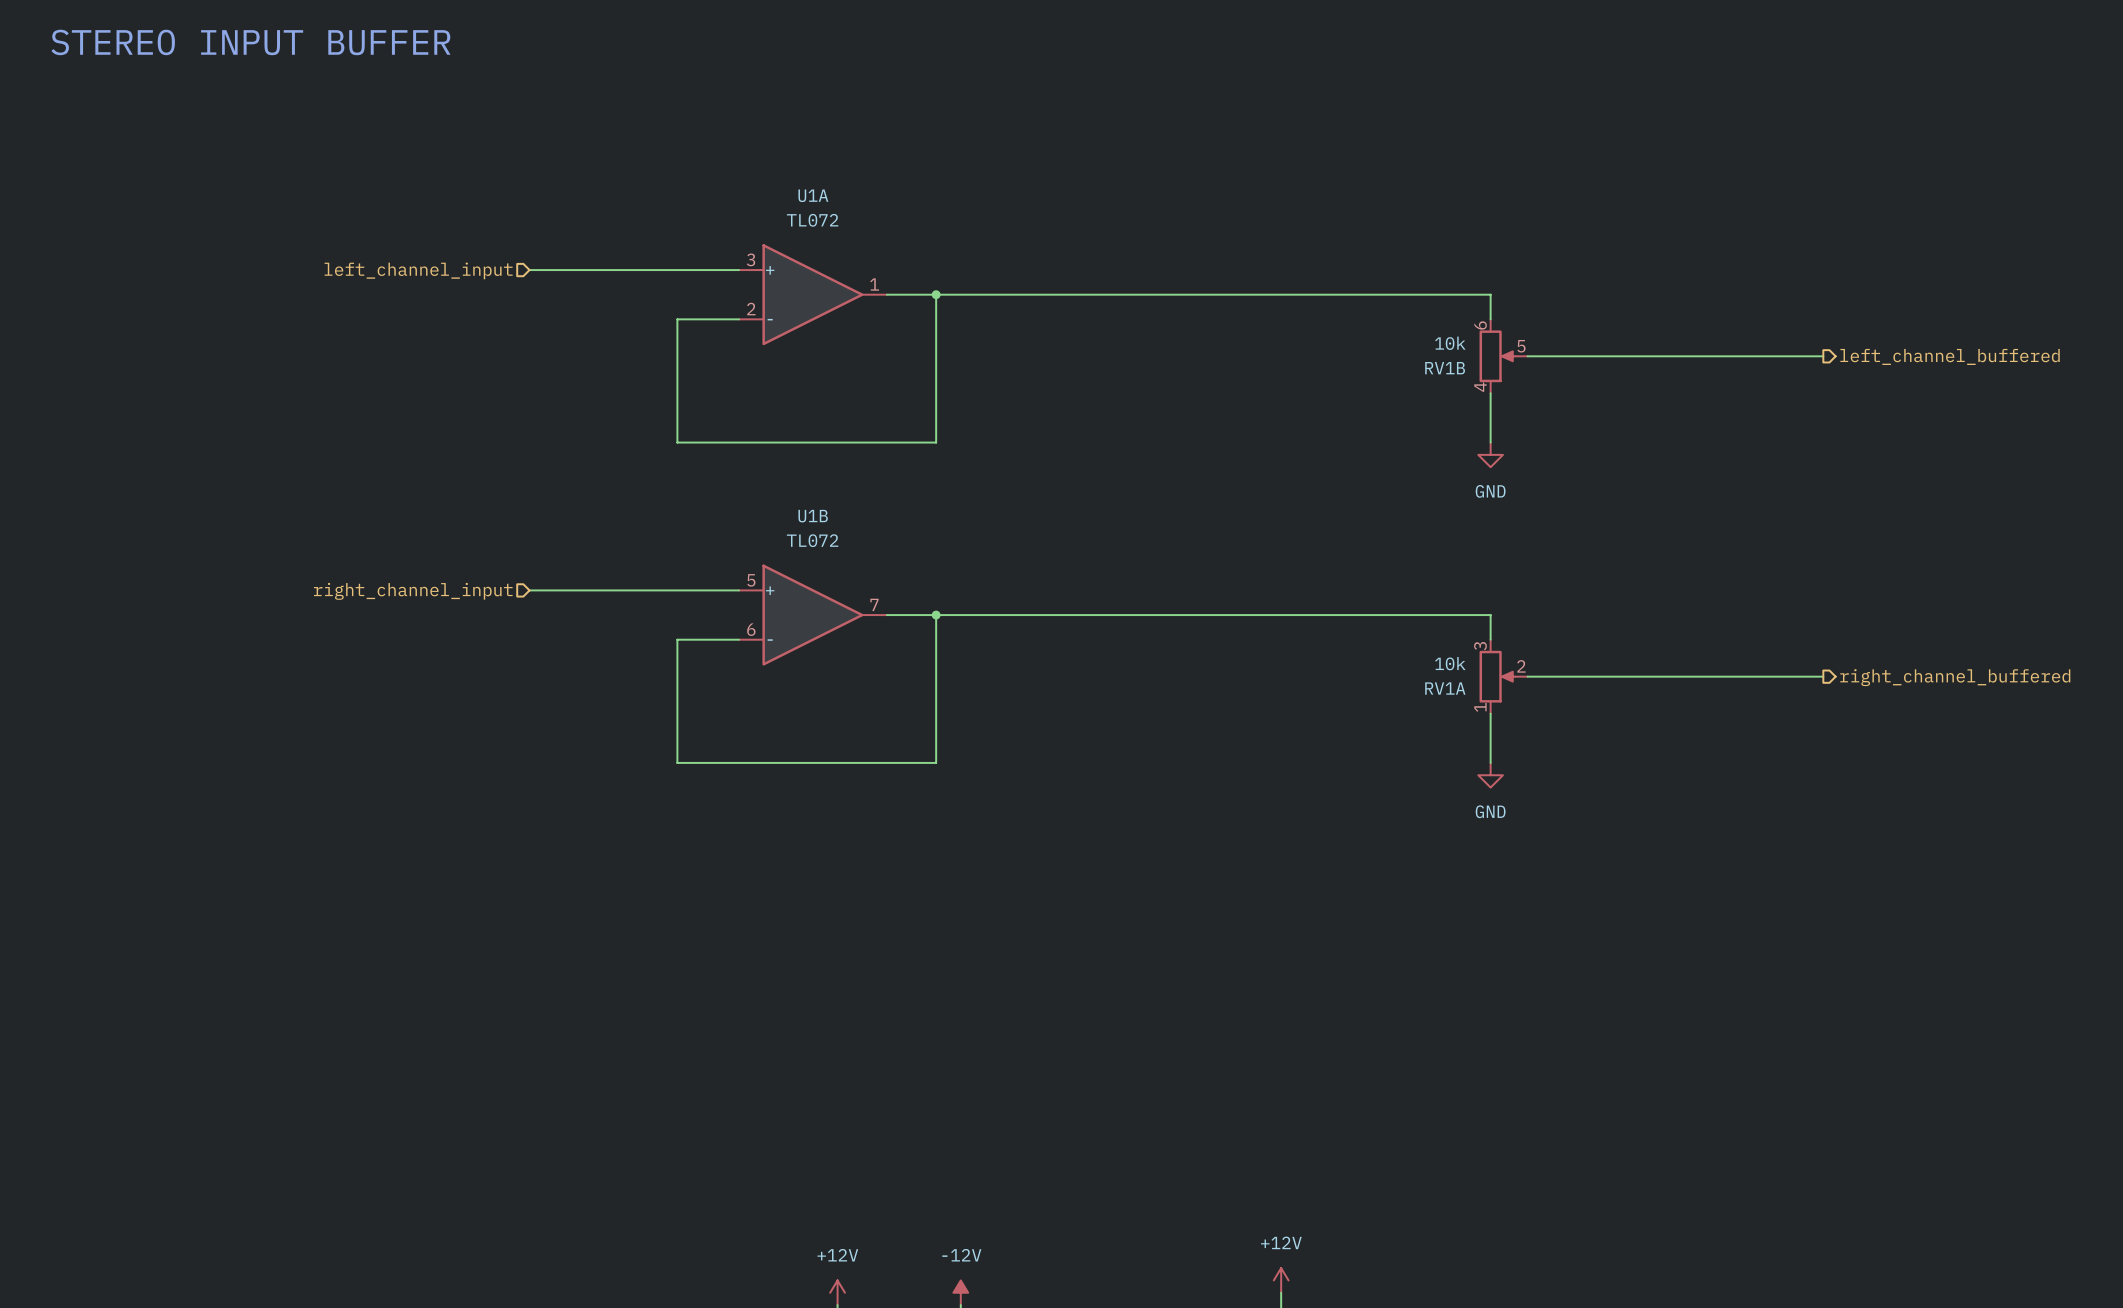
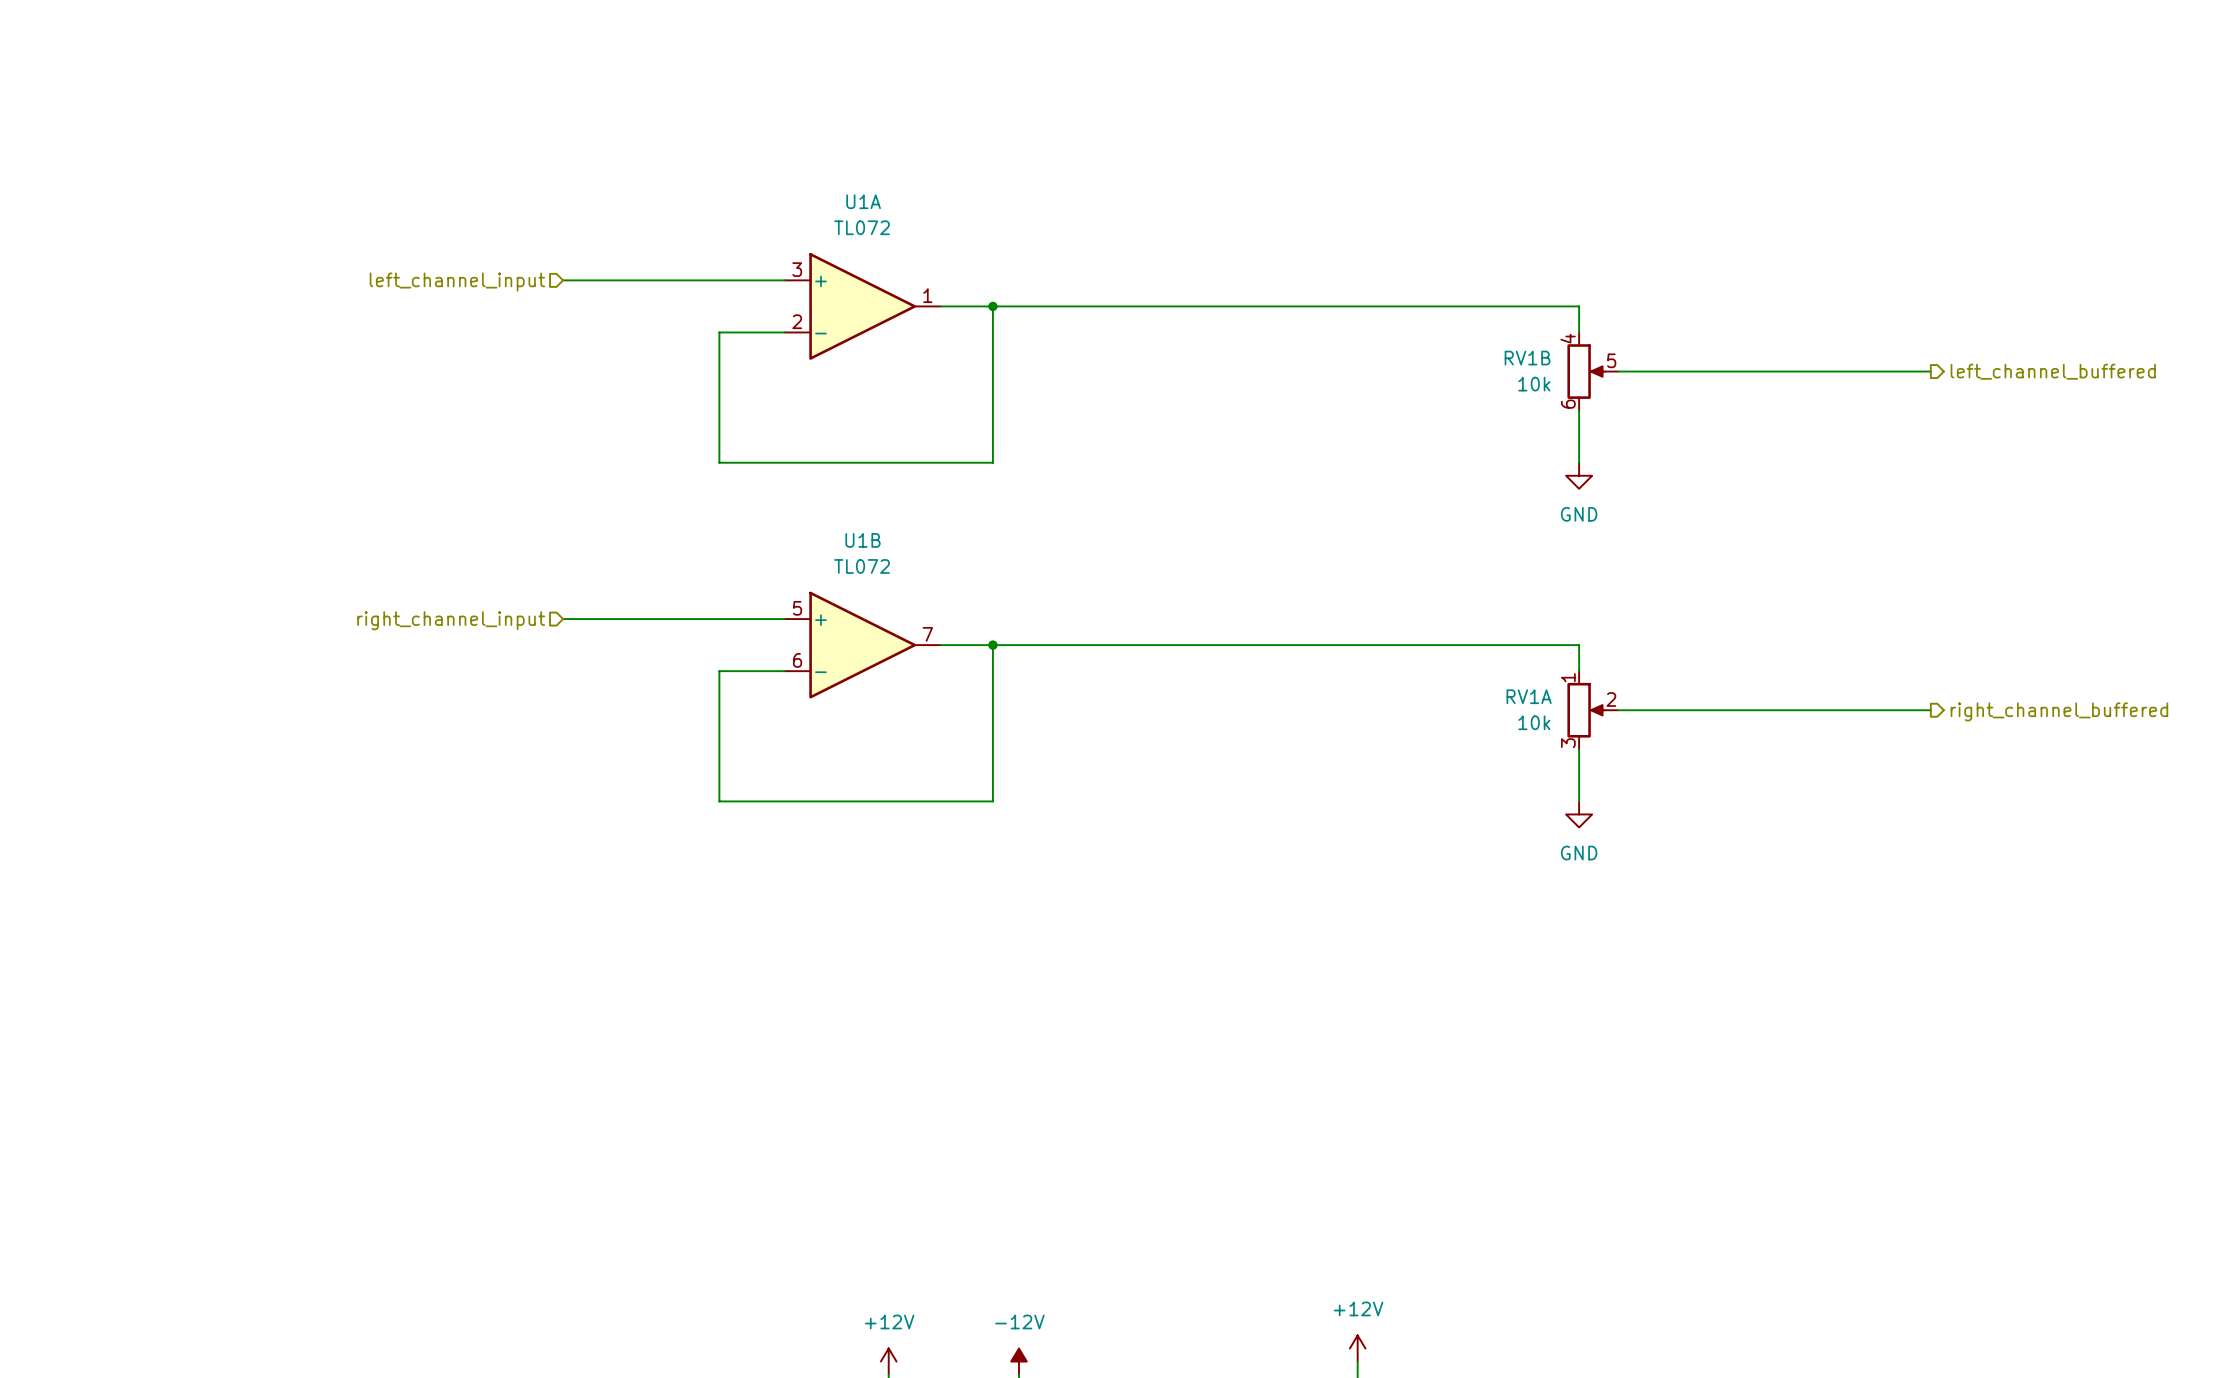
text: STEREO INPUT BUFFER (250, 42) -> none
RV1B flip: as is (1497, 356) -> up-down (1586, 371)
RV1A flip: as is (1497, 676) -> up-down (1586, 710)

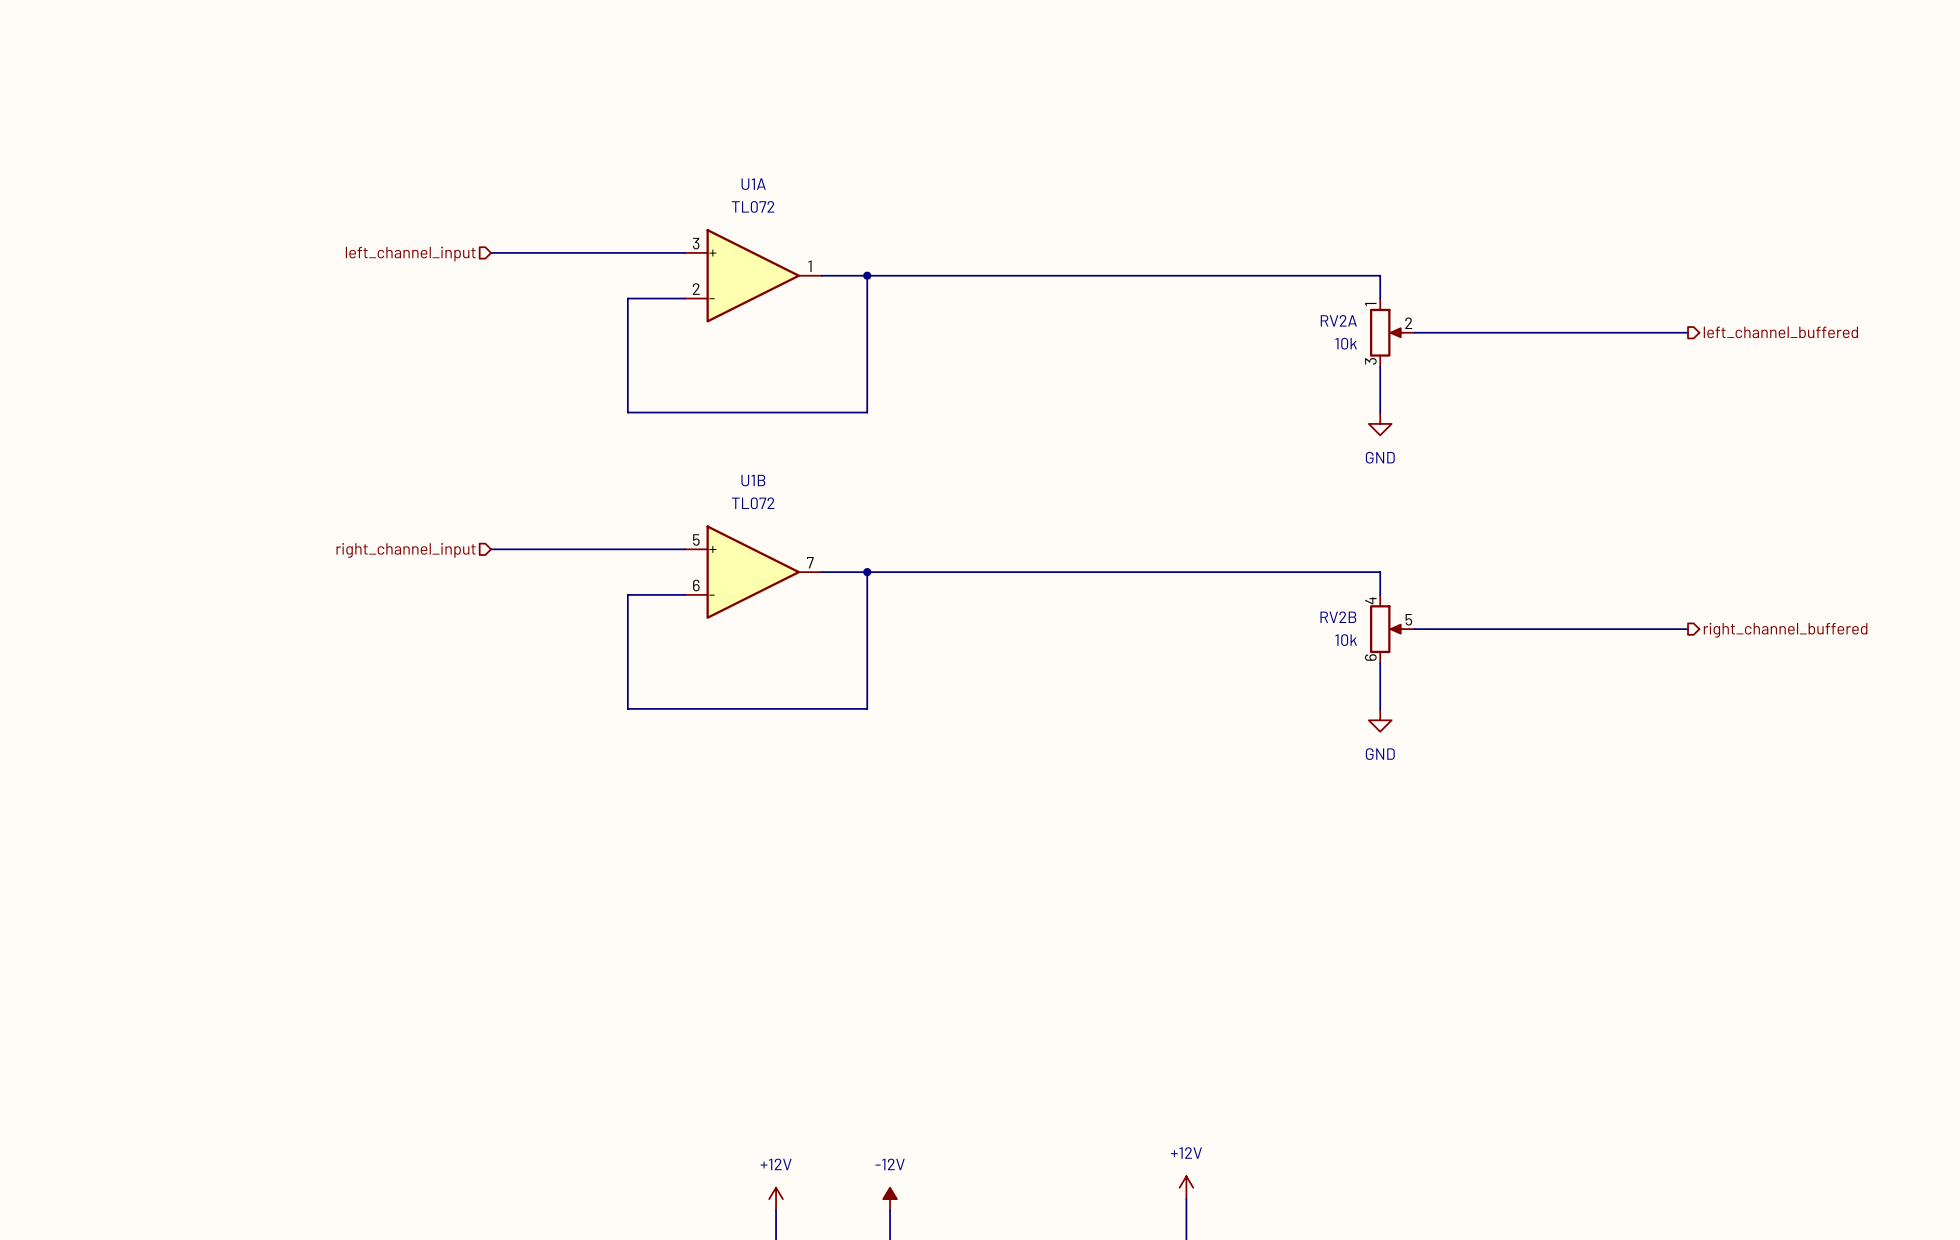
RV1B pin number: 4 (1568, 338) -> 1 (1370, 304)
RV1B name: RV1B (1527, 358) -> RV2A (1338, 320)
RV1B pin number: 5 (1611, 360) -> 2 (1408, 323)
RV1B pin number: 6 (1568, 404) -> 3 (1370, 361)
RV1A pin number: 1 (1568, 677) -> 4 (1370, 600)
RV1A name: RV1A (1529, 696) -> RV2B (1338, 617)
RV1A pin number: 2 (1611, 699) -> 5 (1408, 619)
RV1A pin number: 3 (1568, 743) -> 6 (1370, 657)

